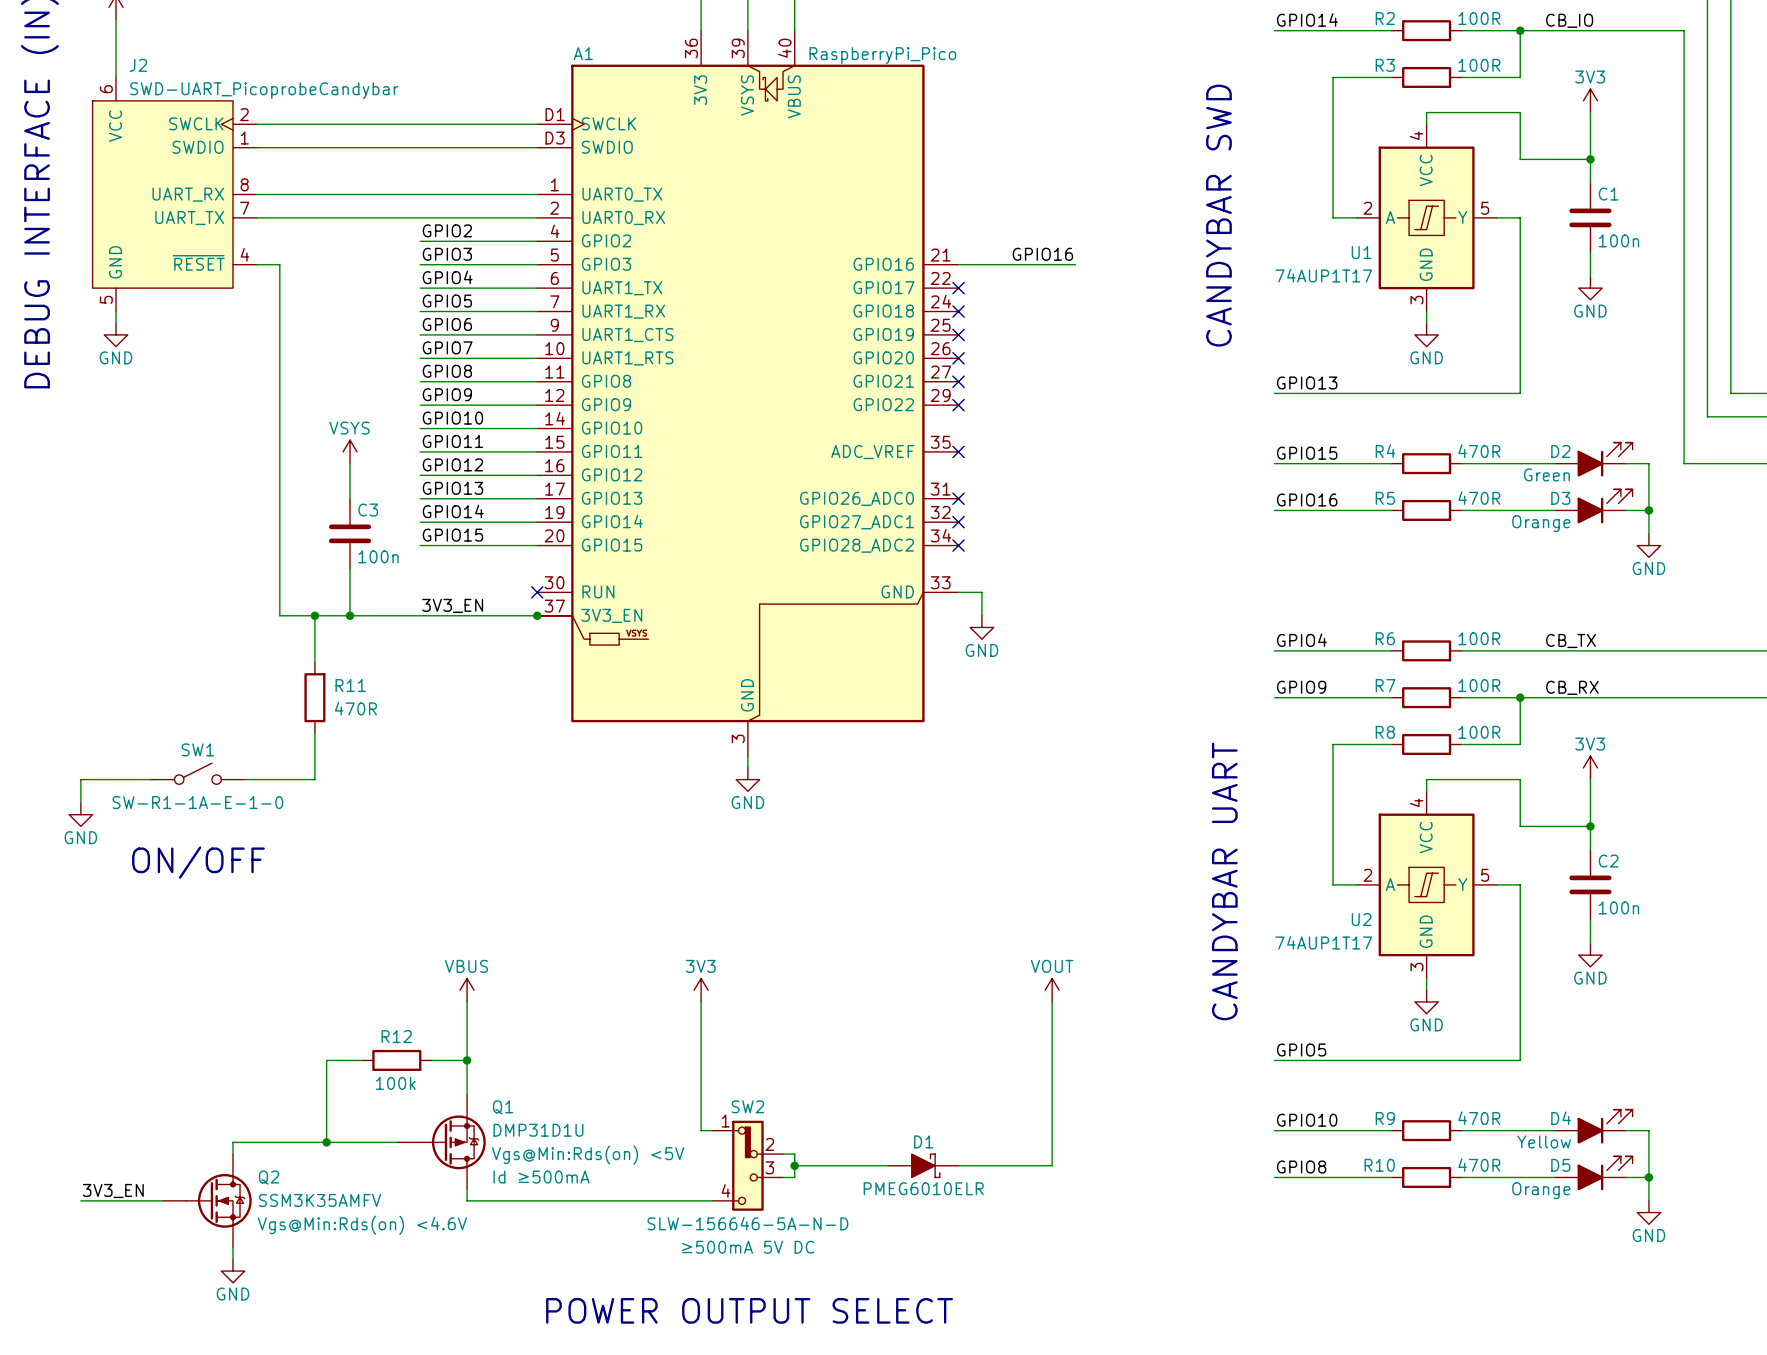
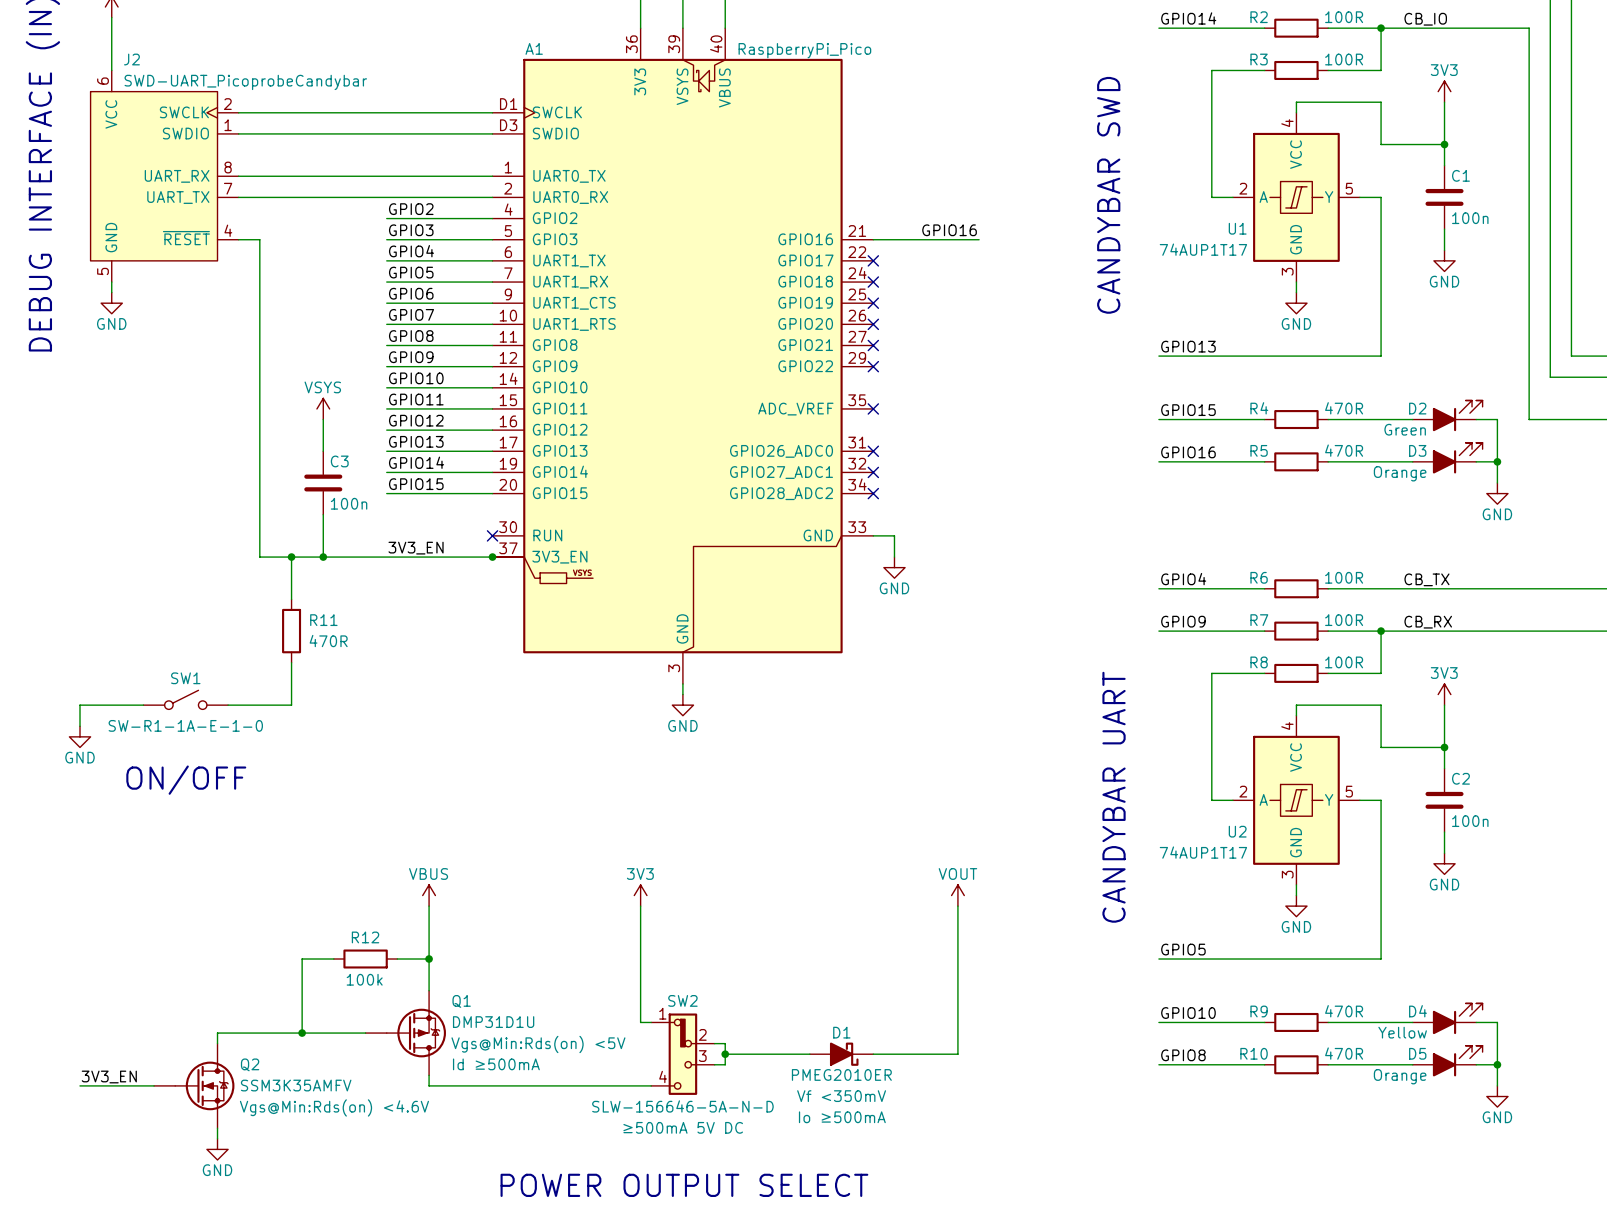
D1 symbol: [888, 1154, 959, 1178] -> [809, 1042, 874, 1066]
D1 value: PMEG6010ELR (923, 1188) -> PMEG2010ER (841, 1074)
D1 text: none -> Vf <350mV (841, 1096)
D1 text: none -> Io ≥500mA (842, 1117)

